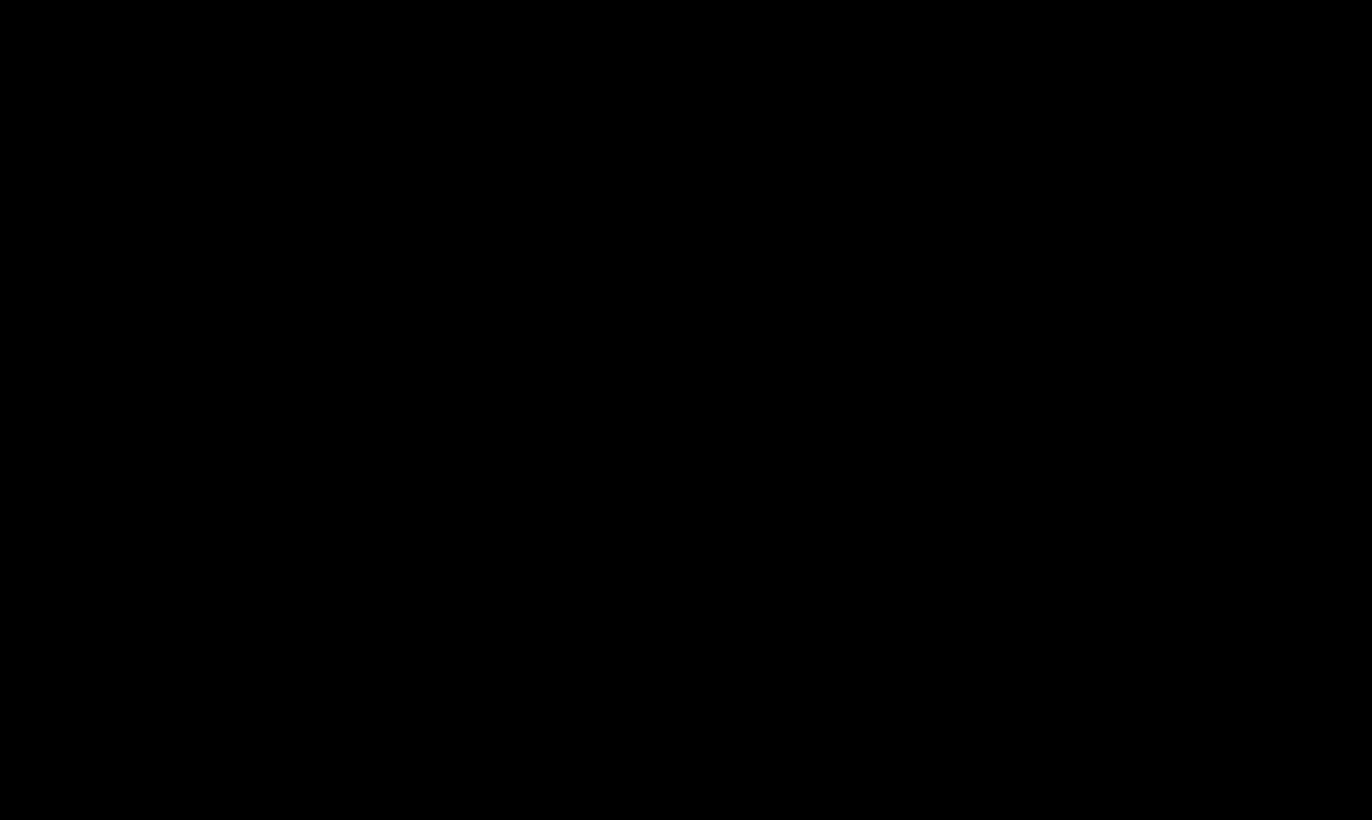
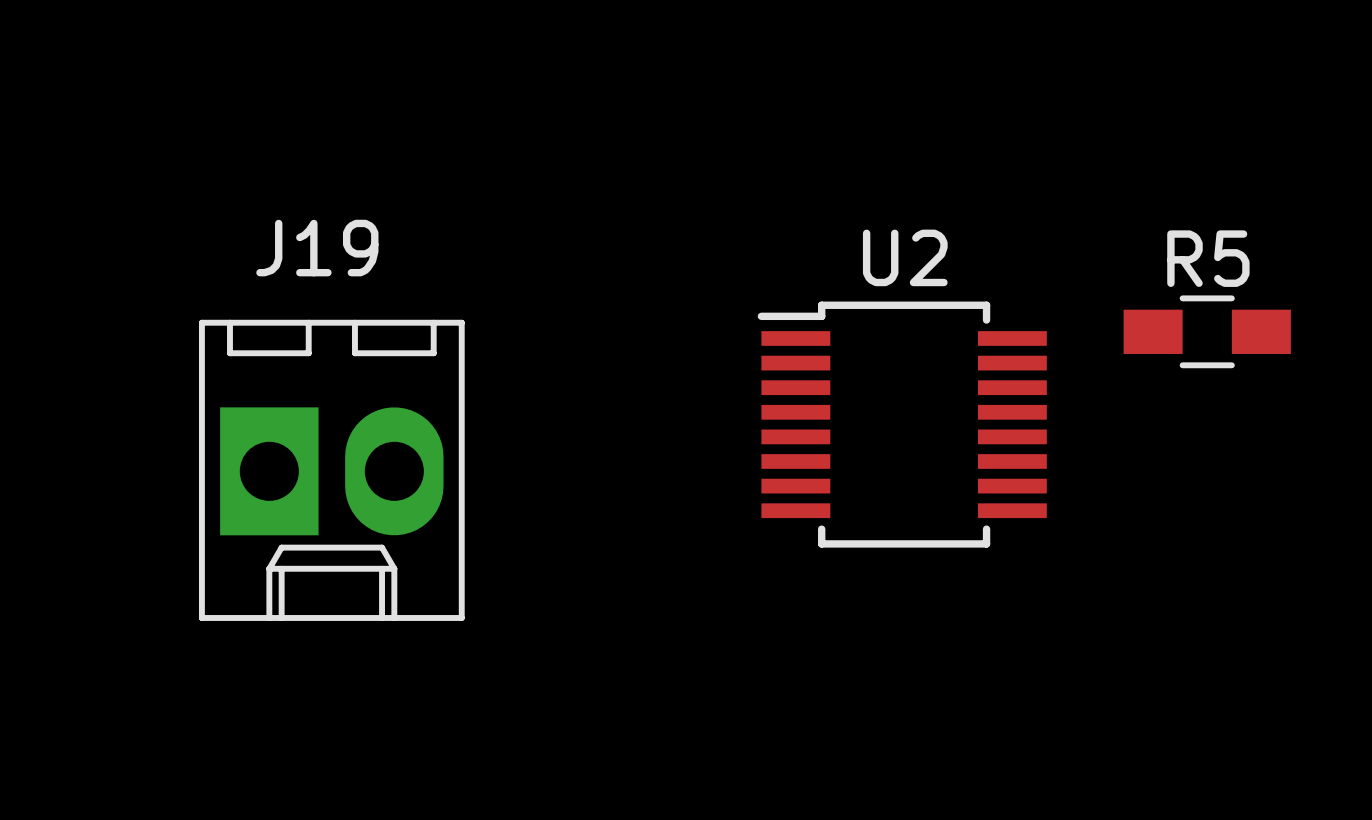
R5: none -> (1207, 331)
U2: none -> (902, 424)
J19: none -> (331, 470)

